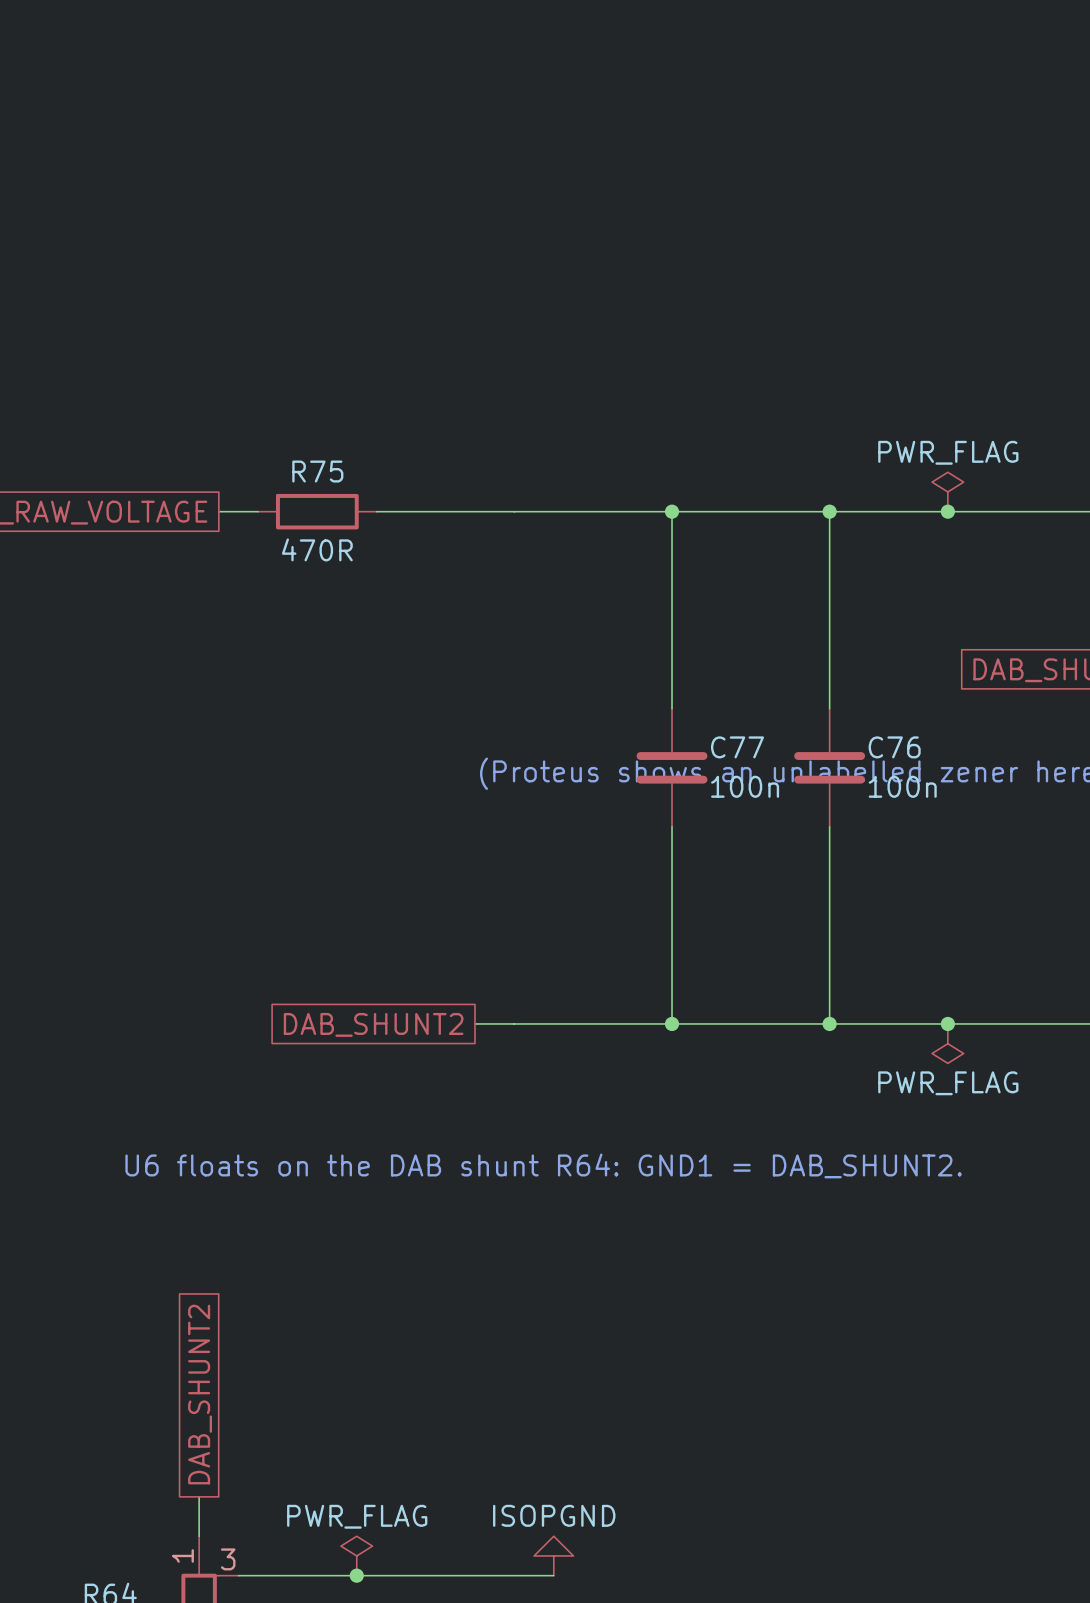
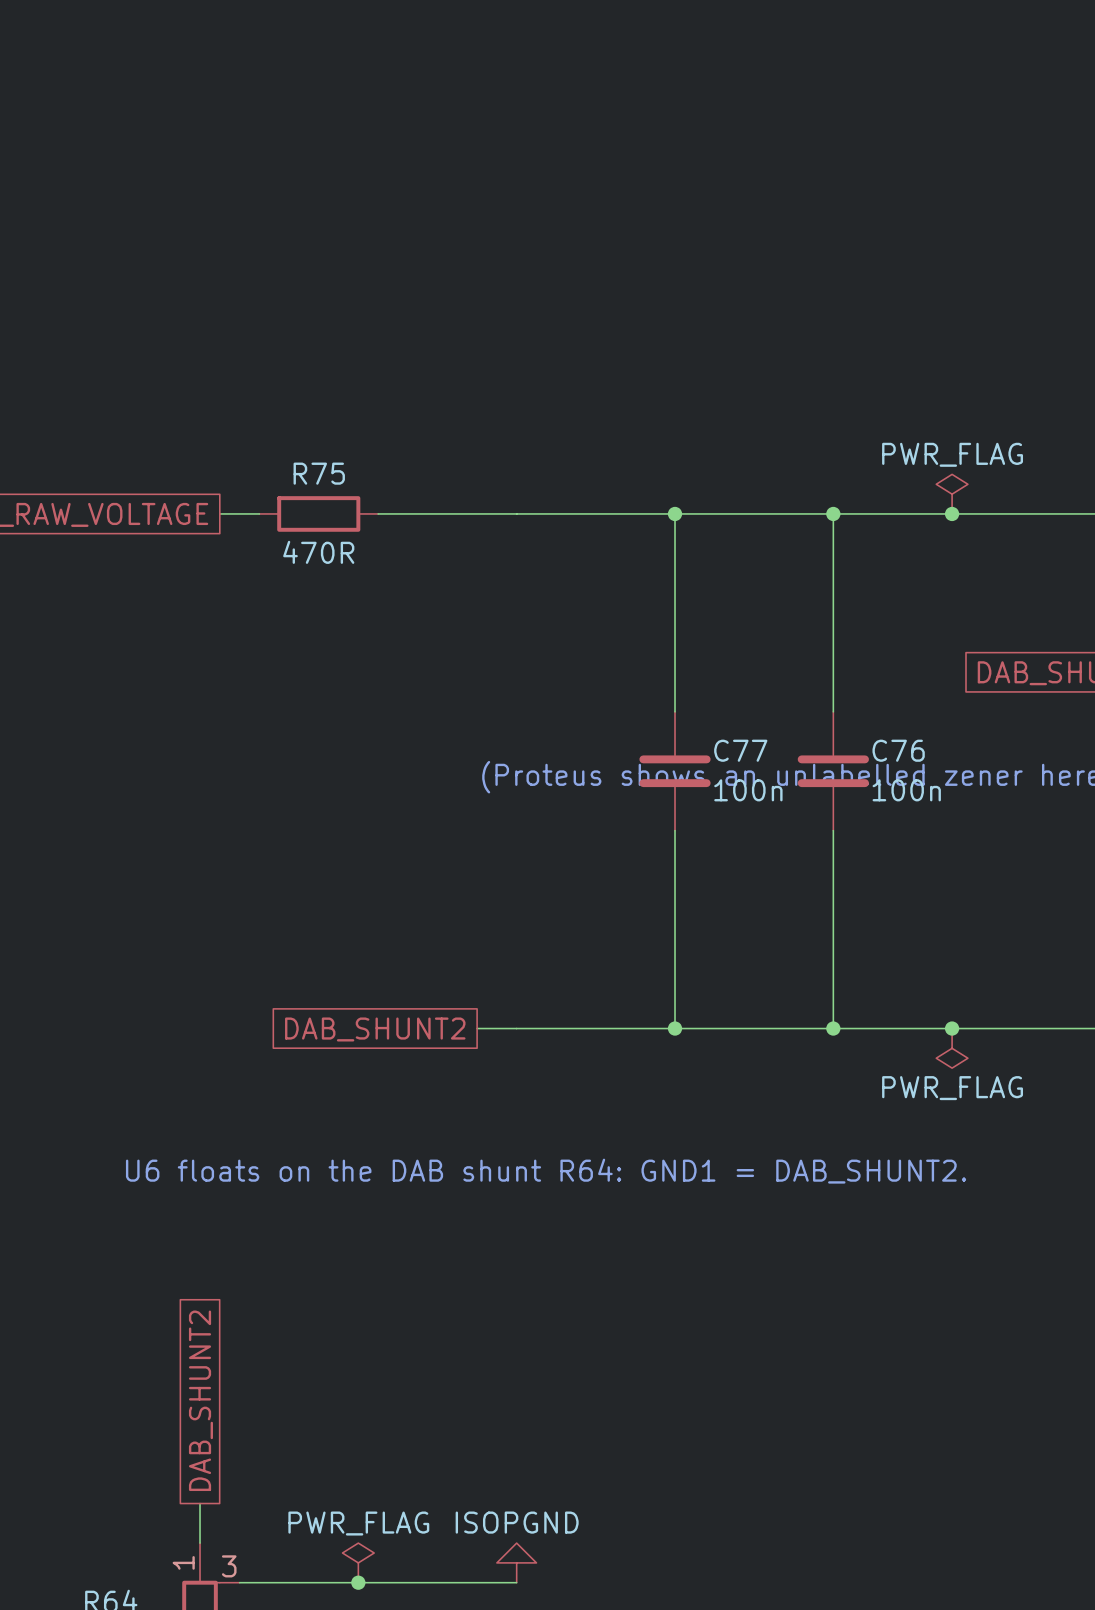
power symbol position: ISOPGND (553, 1555) -> ISOPGND (516, 1562)
wire: (514, 1575) (553, 1575) -> none

